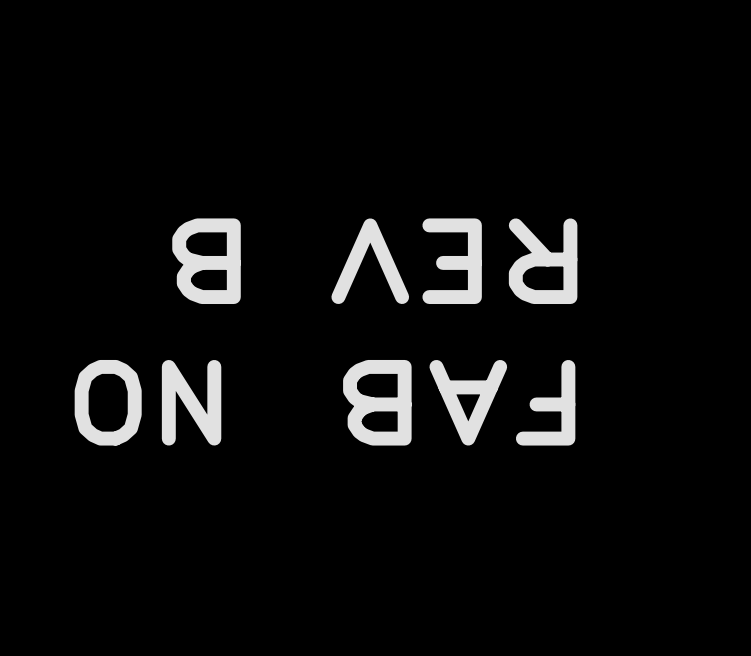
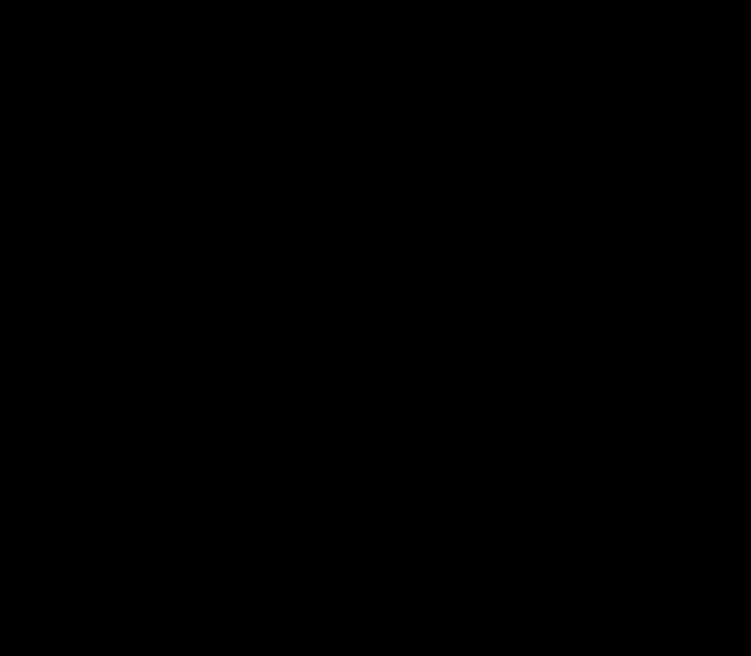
text: REV B (374, 261) -> none
text: NO (147, 402) -> none
text: FAB (459, 402) -> none

